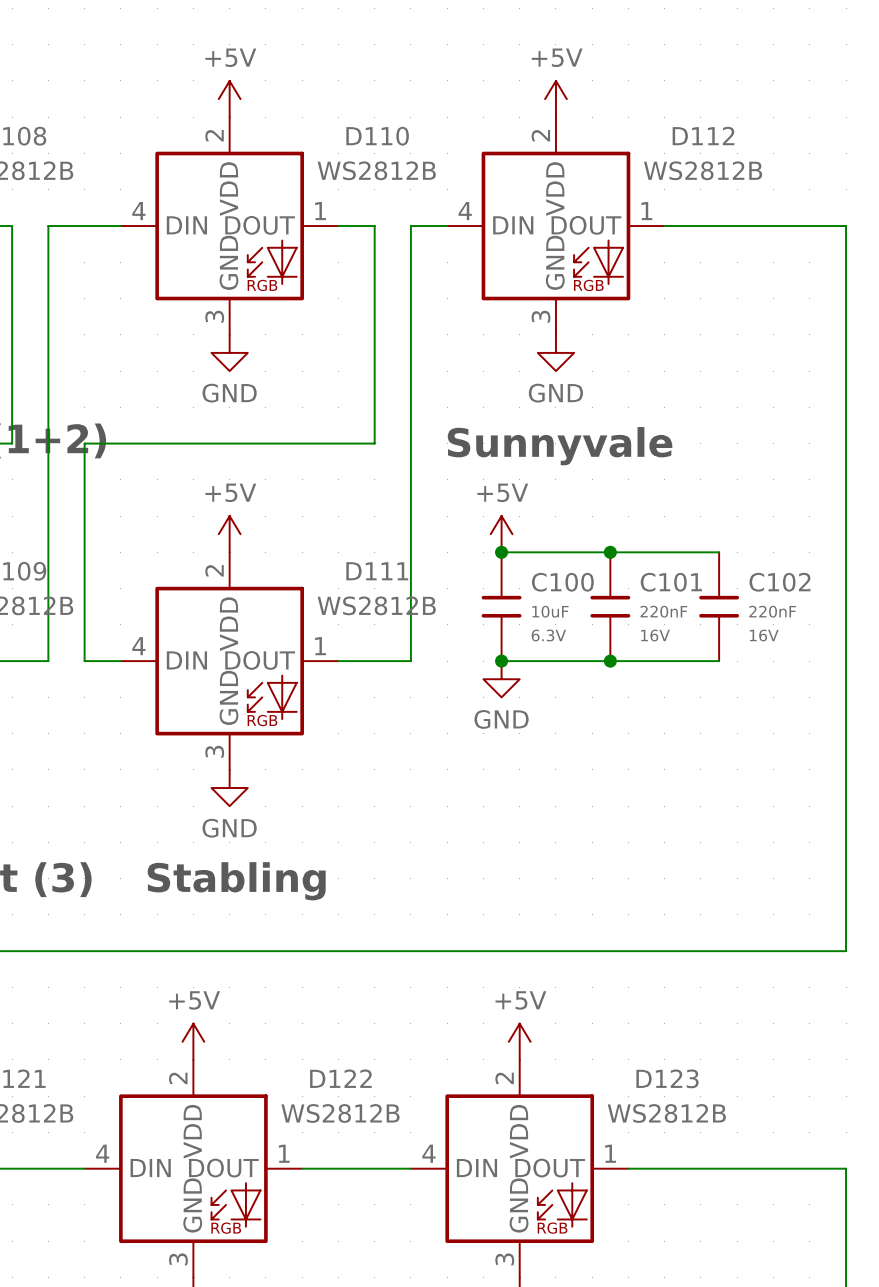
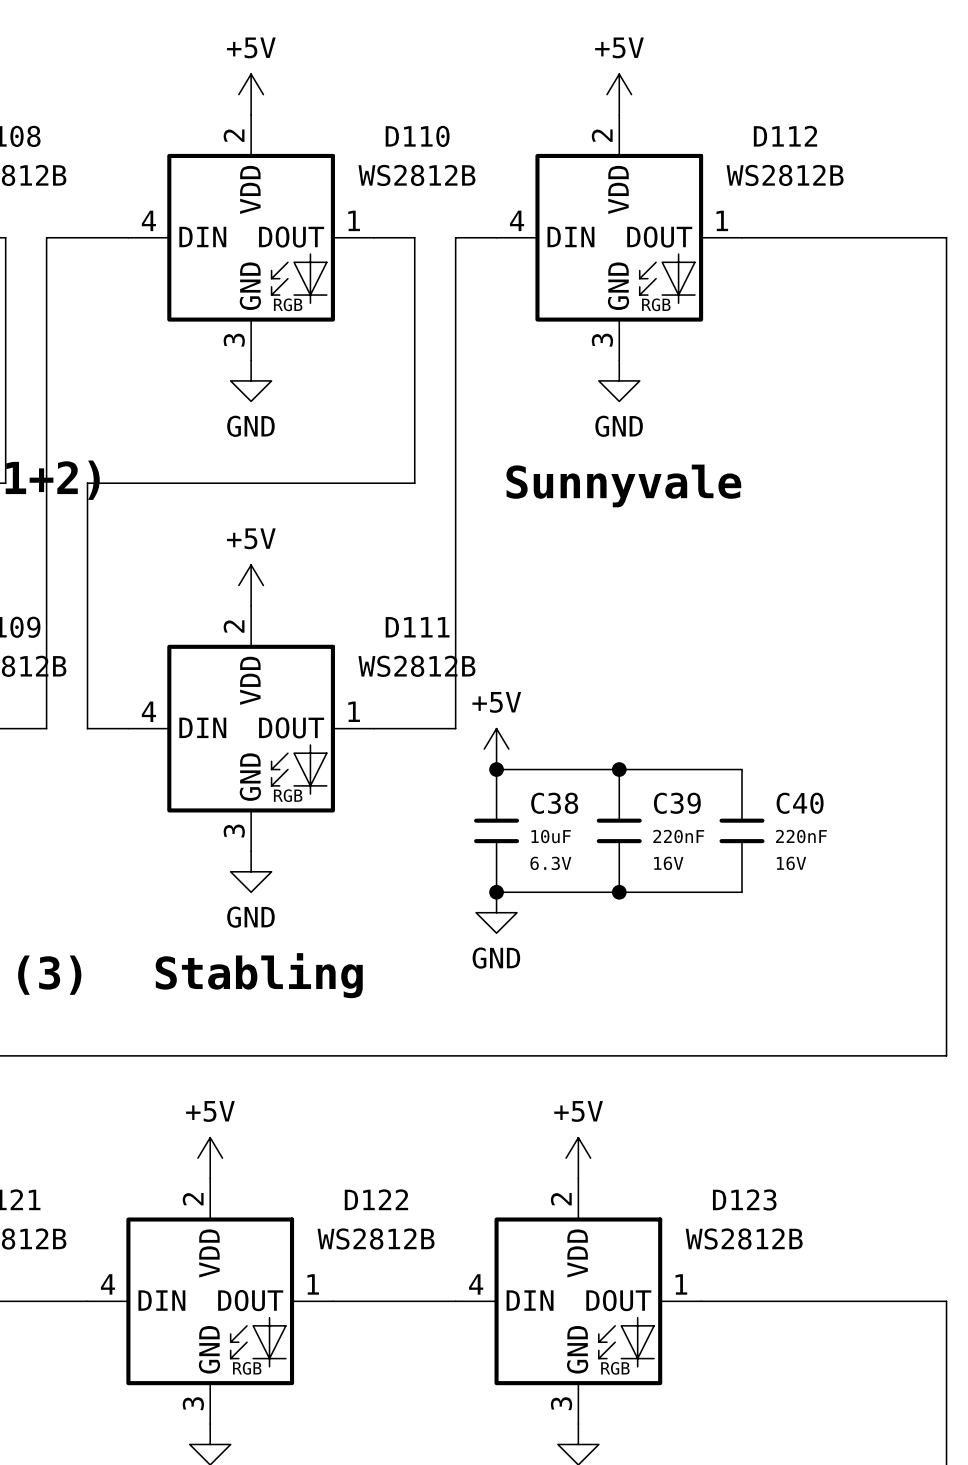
power symbol position: +5V (501, 534) -> +5V (496, 749)
wire: (501, 552) (719, 552) -> (496, 769) (741, 769)
junction: (501, 552) -> none
junction: (610, 552) -> none
C100: 10uF (501, 606) -> none
C101: 220nF (610, 606) -> none
C102: 220nF (719, 606) -> none
wire: (501, 661) (719, 661) -> (496, 892) (741, 892)
junction: (501, 661) -> none
junction: (610, 661) -> none
power symbol position: GND (501, 679) -> GND (496, 912)
junction: none -> (496, 769)
junction: none -> (619, 769)
C38: none -> 10uF (496, 830)
C39: none -> 220nF (619, 830)
C40: none -> 220nF (741, 830)
junction: none -> (496, 892)
junction: none -> (619, 892)

